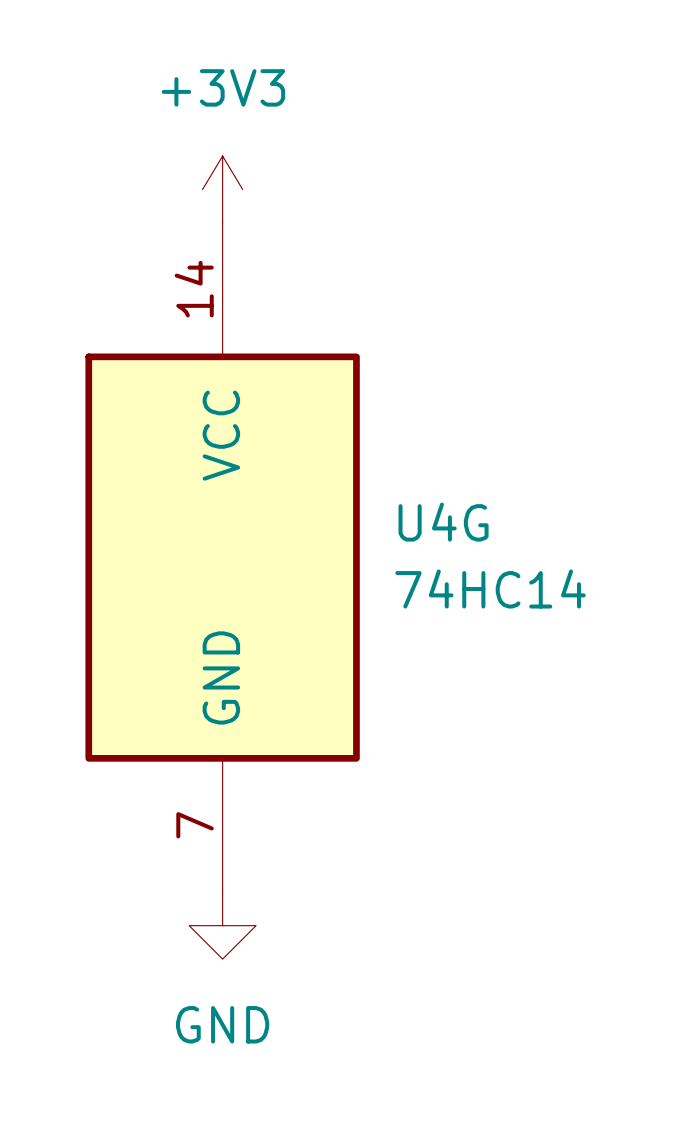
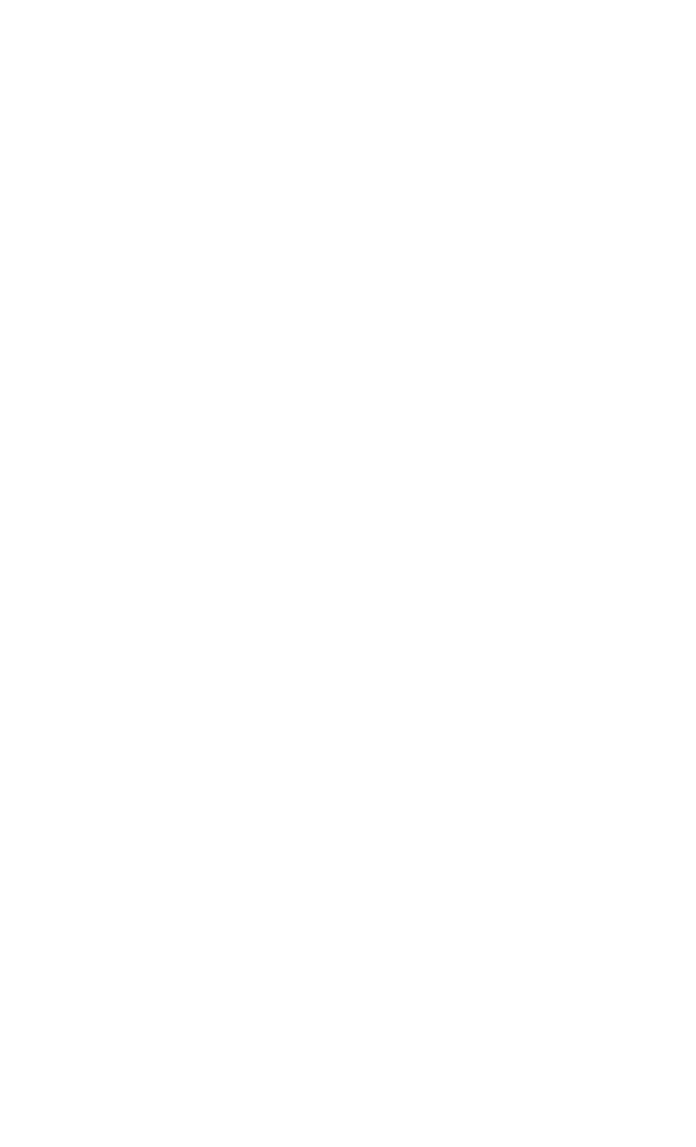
power symbol: +3V3 (222, 189) -> none
U4G: 74HC14 (222, 557) -> none
power symbol: GND (222, 925) -> none

